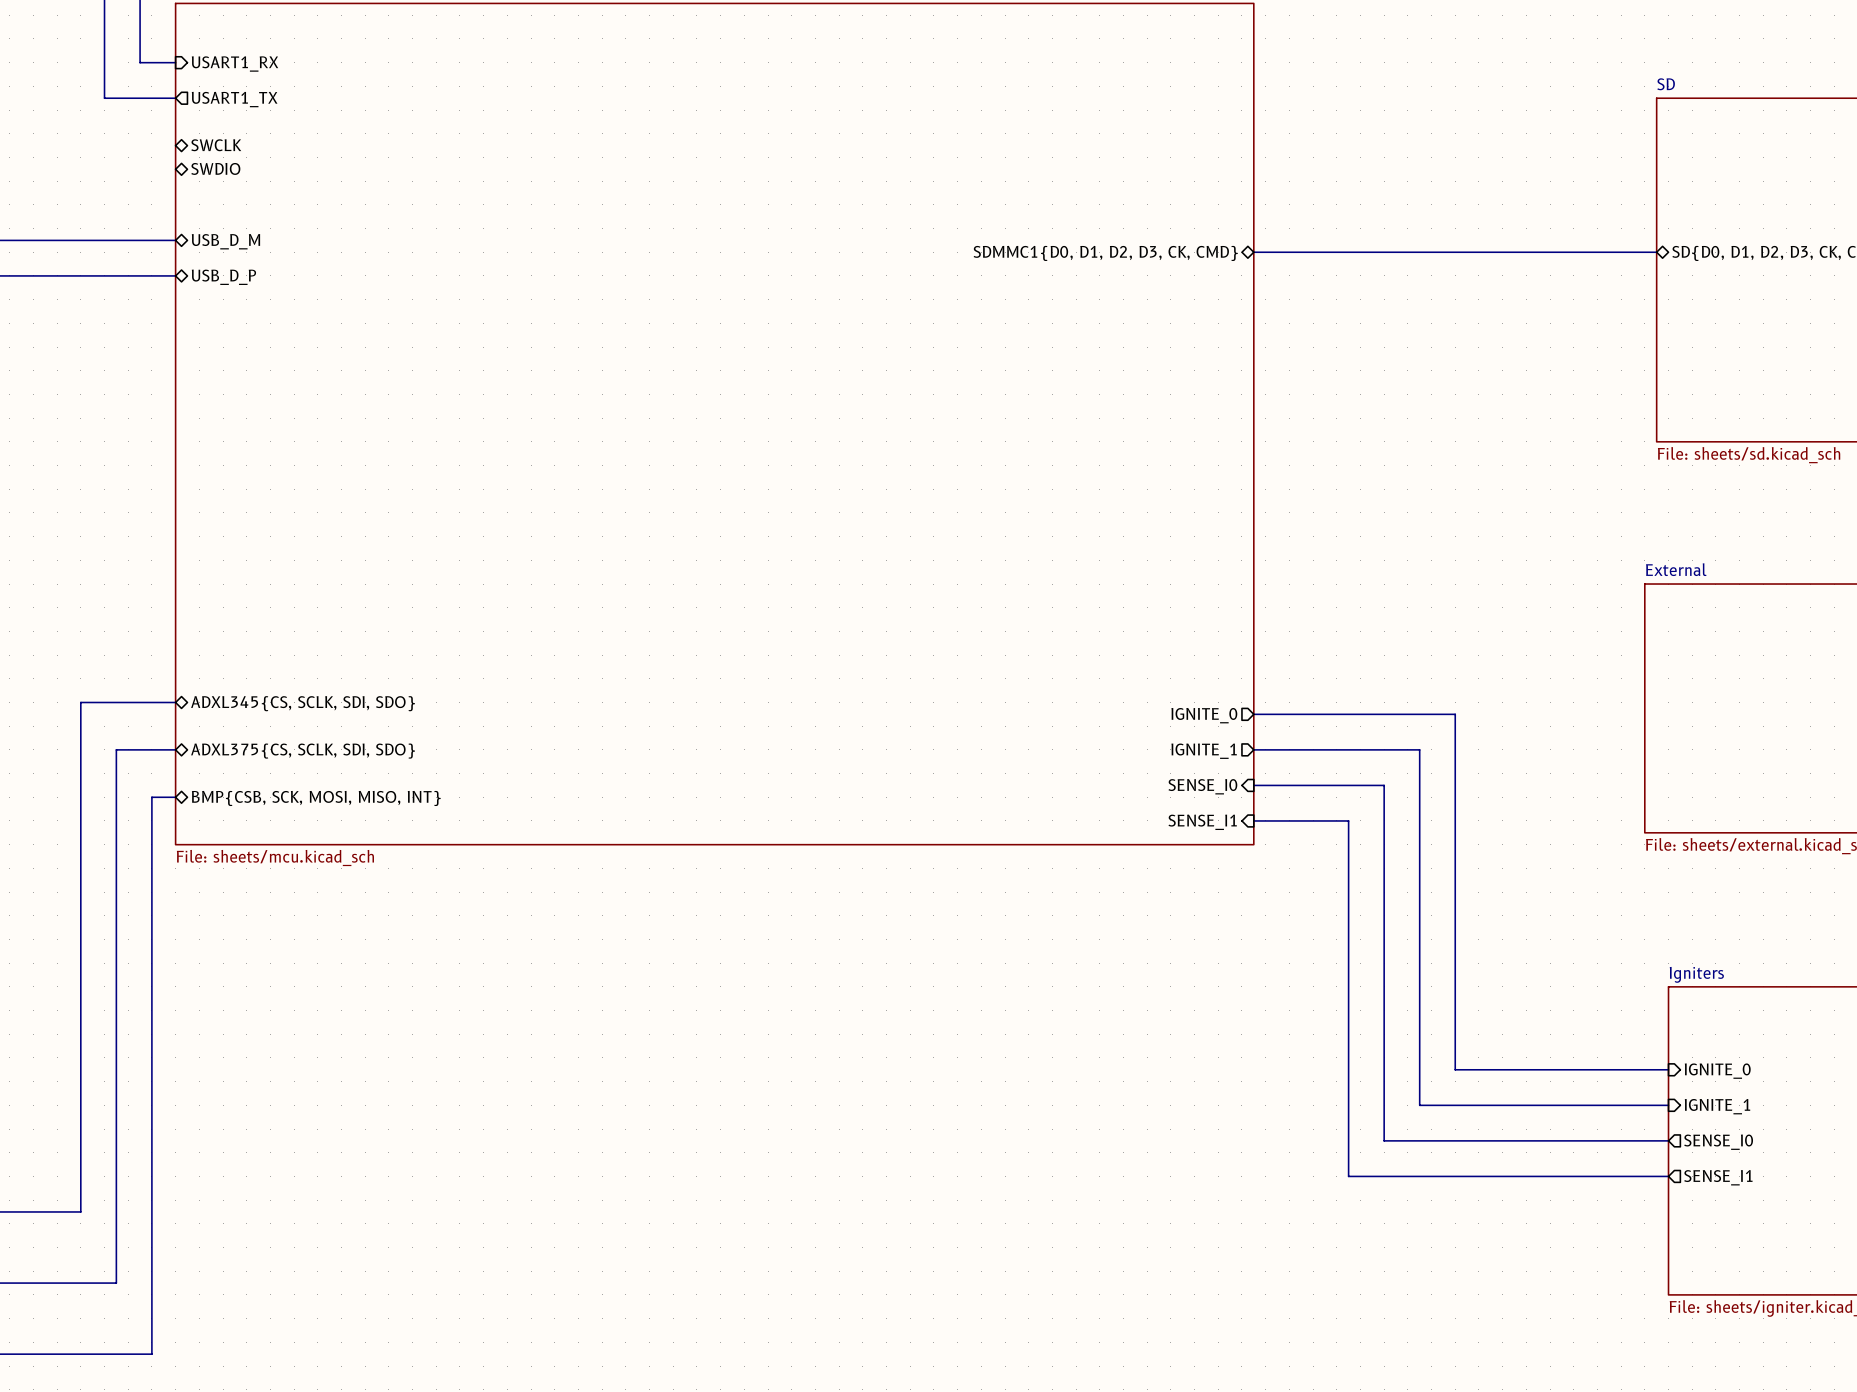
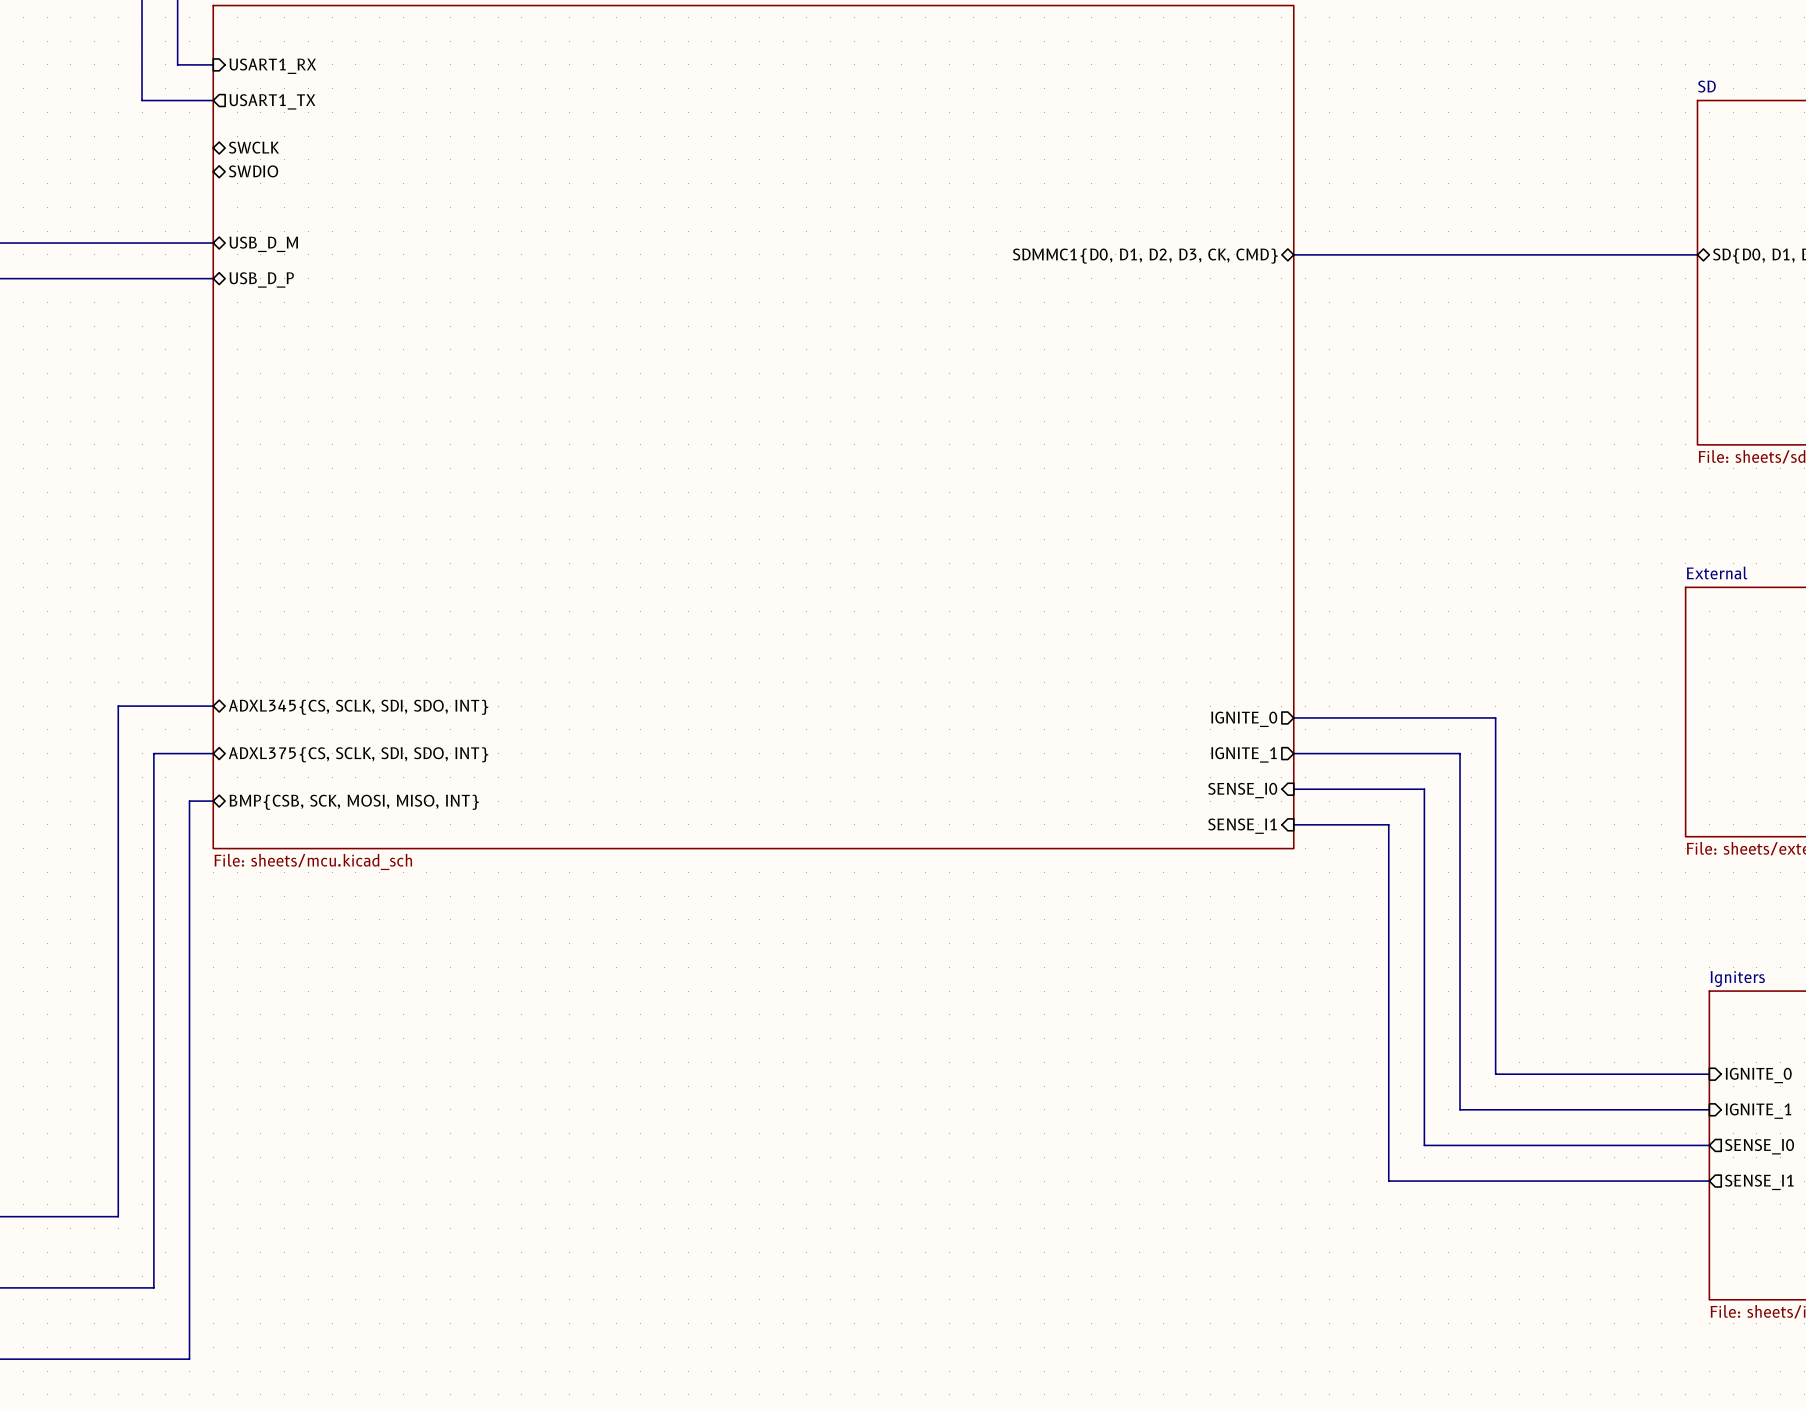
sheet pin: ADXL345{CS, SCLK, SDI, SDO} (303, 703) -> ADXL345{CS, SCLK, SDI, SDO, INT} (358, 707)
sheet pin: ADXL375{CS, SCLK, SDI, SDO} (303, 751) -> ADXL375{CS, SCLK, SDI, SDO, INT} (358, 754)

